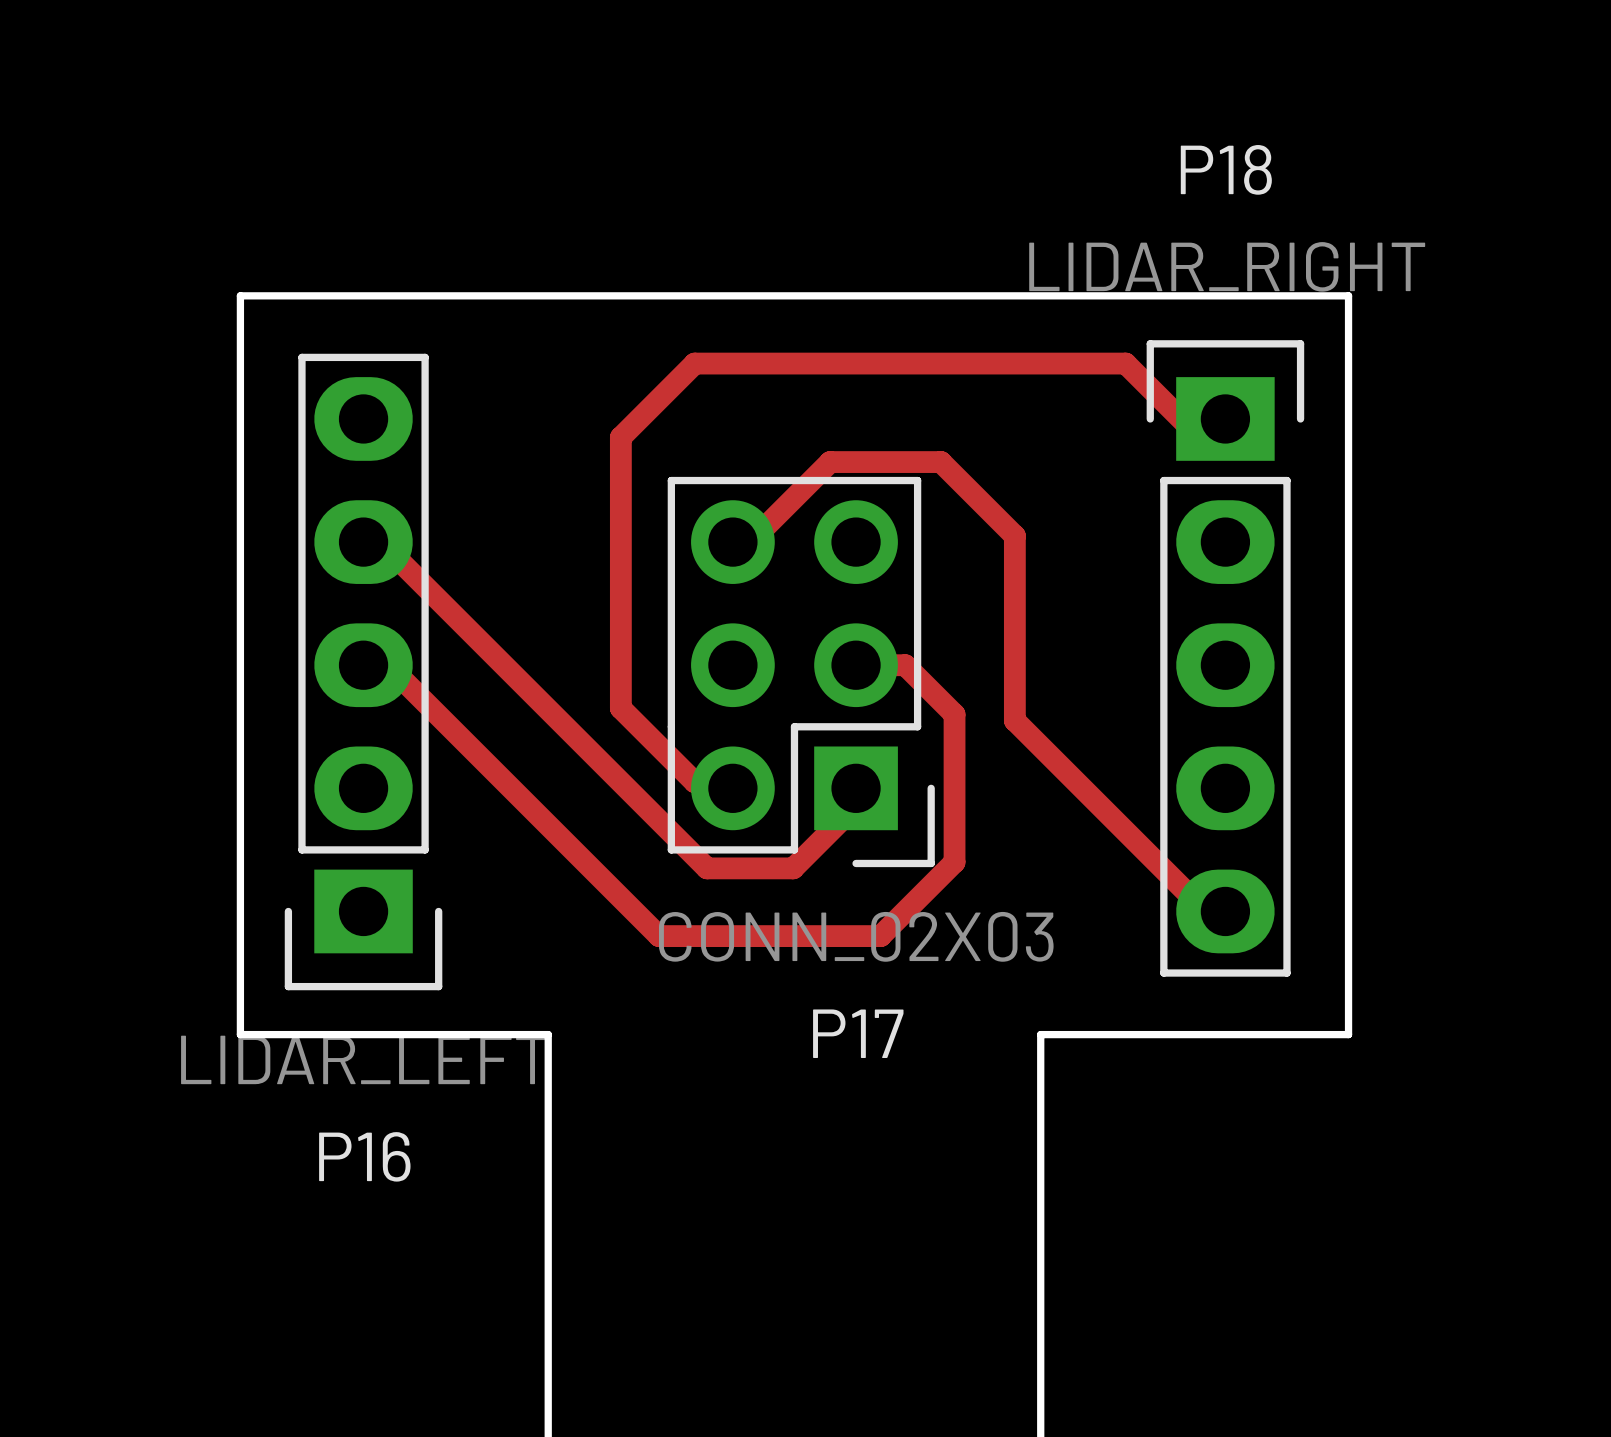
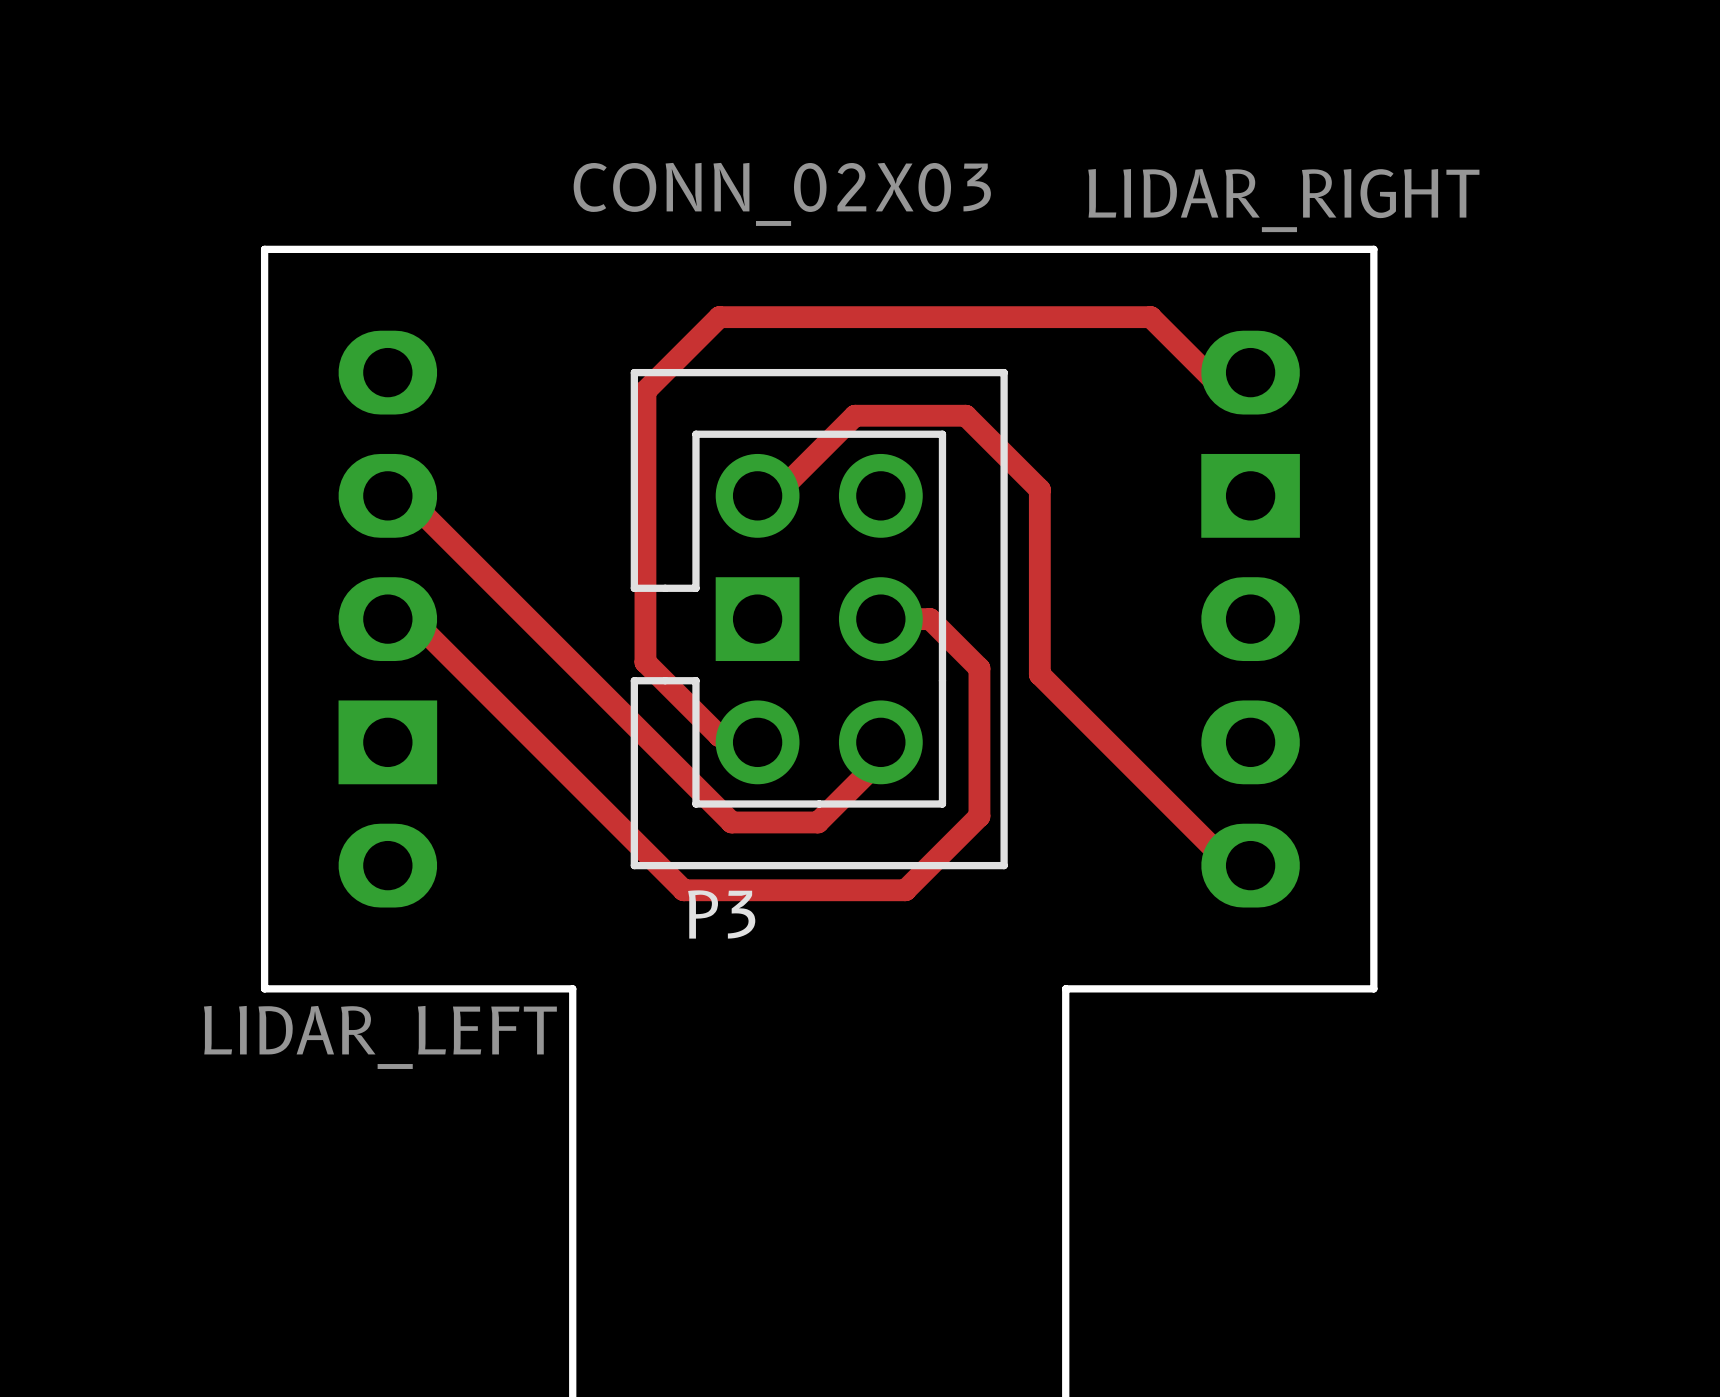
P18: LIDAR_RIGHT (1225, 658) -> none
part: none -> LIDAR_LEFT (387, 619)
P3: none -> CONN_02X03 (819, 619)
part: none -> LIDAR_RIGHT (1250, 619)
P16: LIDAR_LEFT (363, 672) -> none
P17: CONN_02X03 (801, 672) -> none

